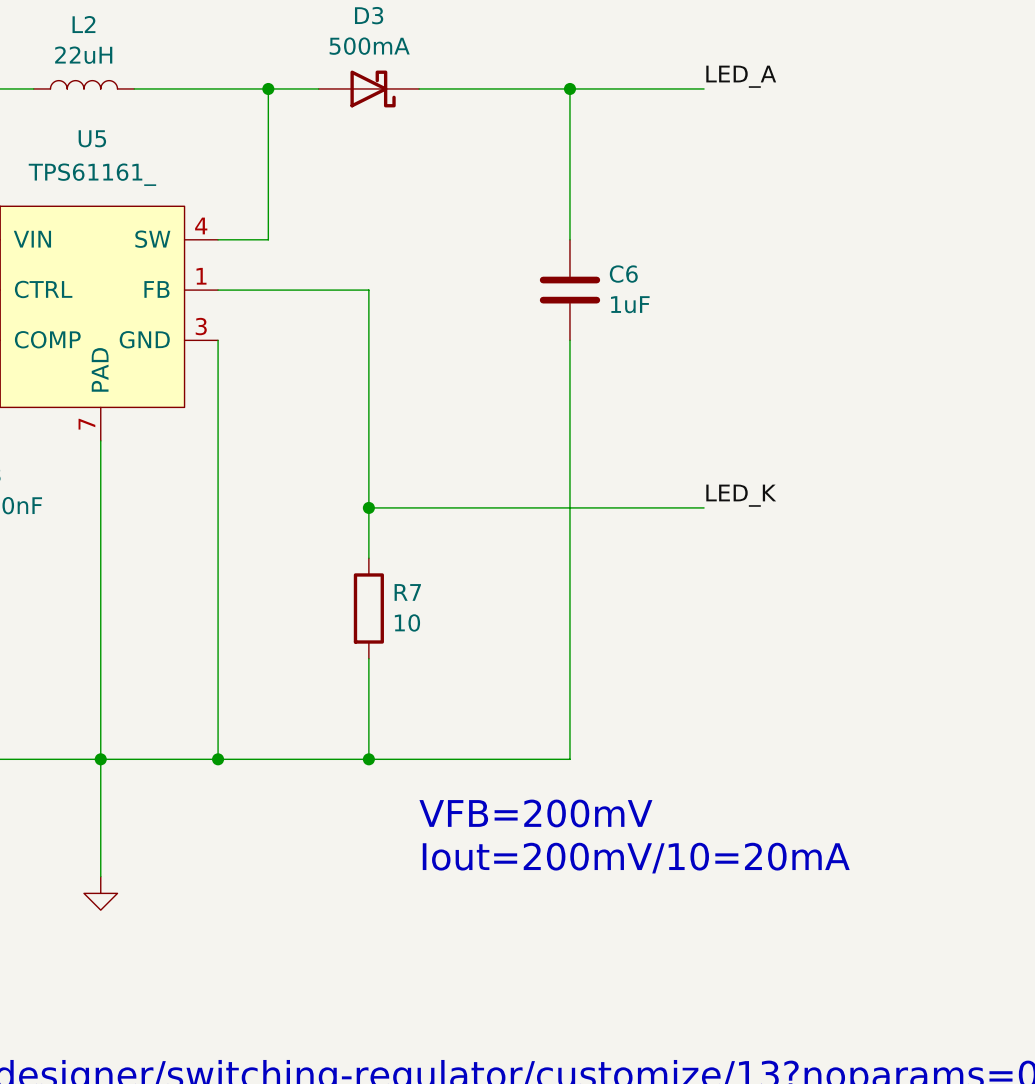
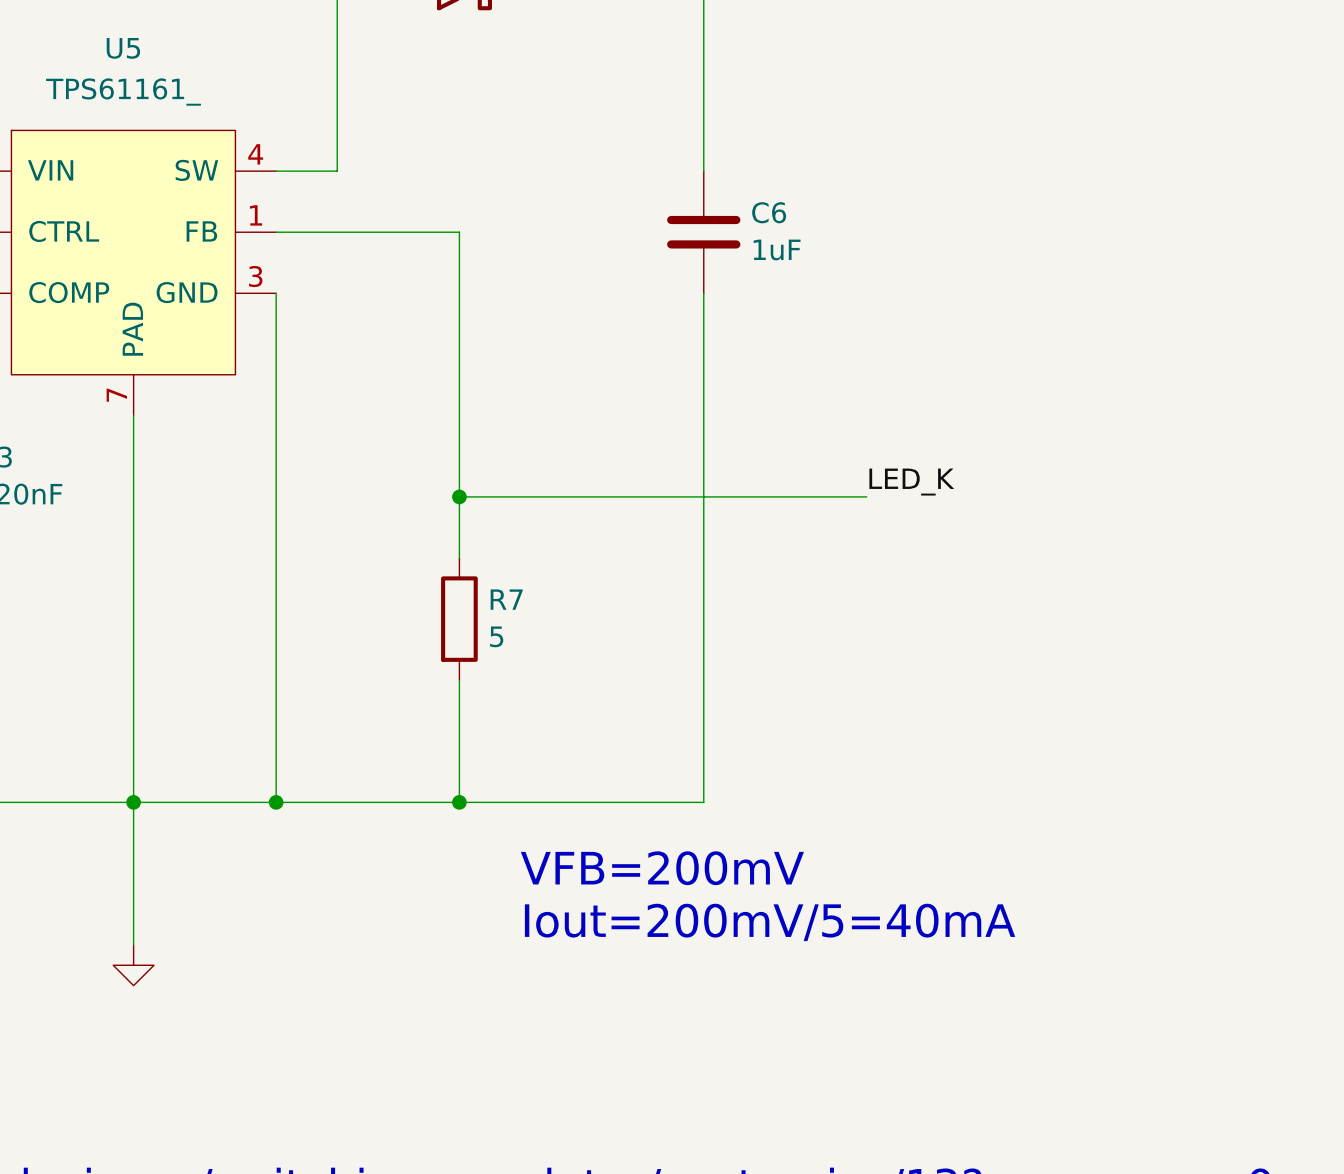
R7 value: 10 (407, 622) -> 5 (496, 636)
text: Iout=200mV/10=20mA (636, 858) -> Iout=200mV/5=40mA (770, 922)

